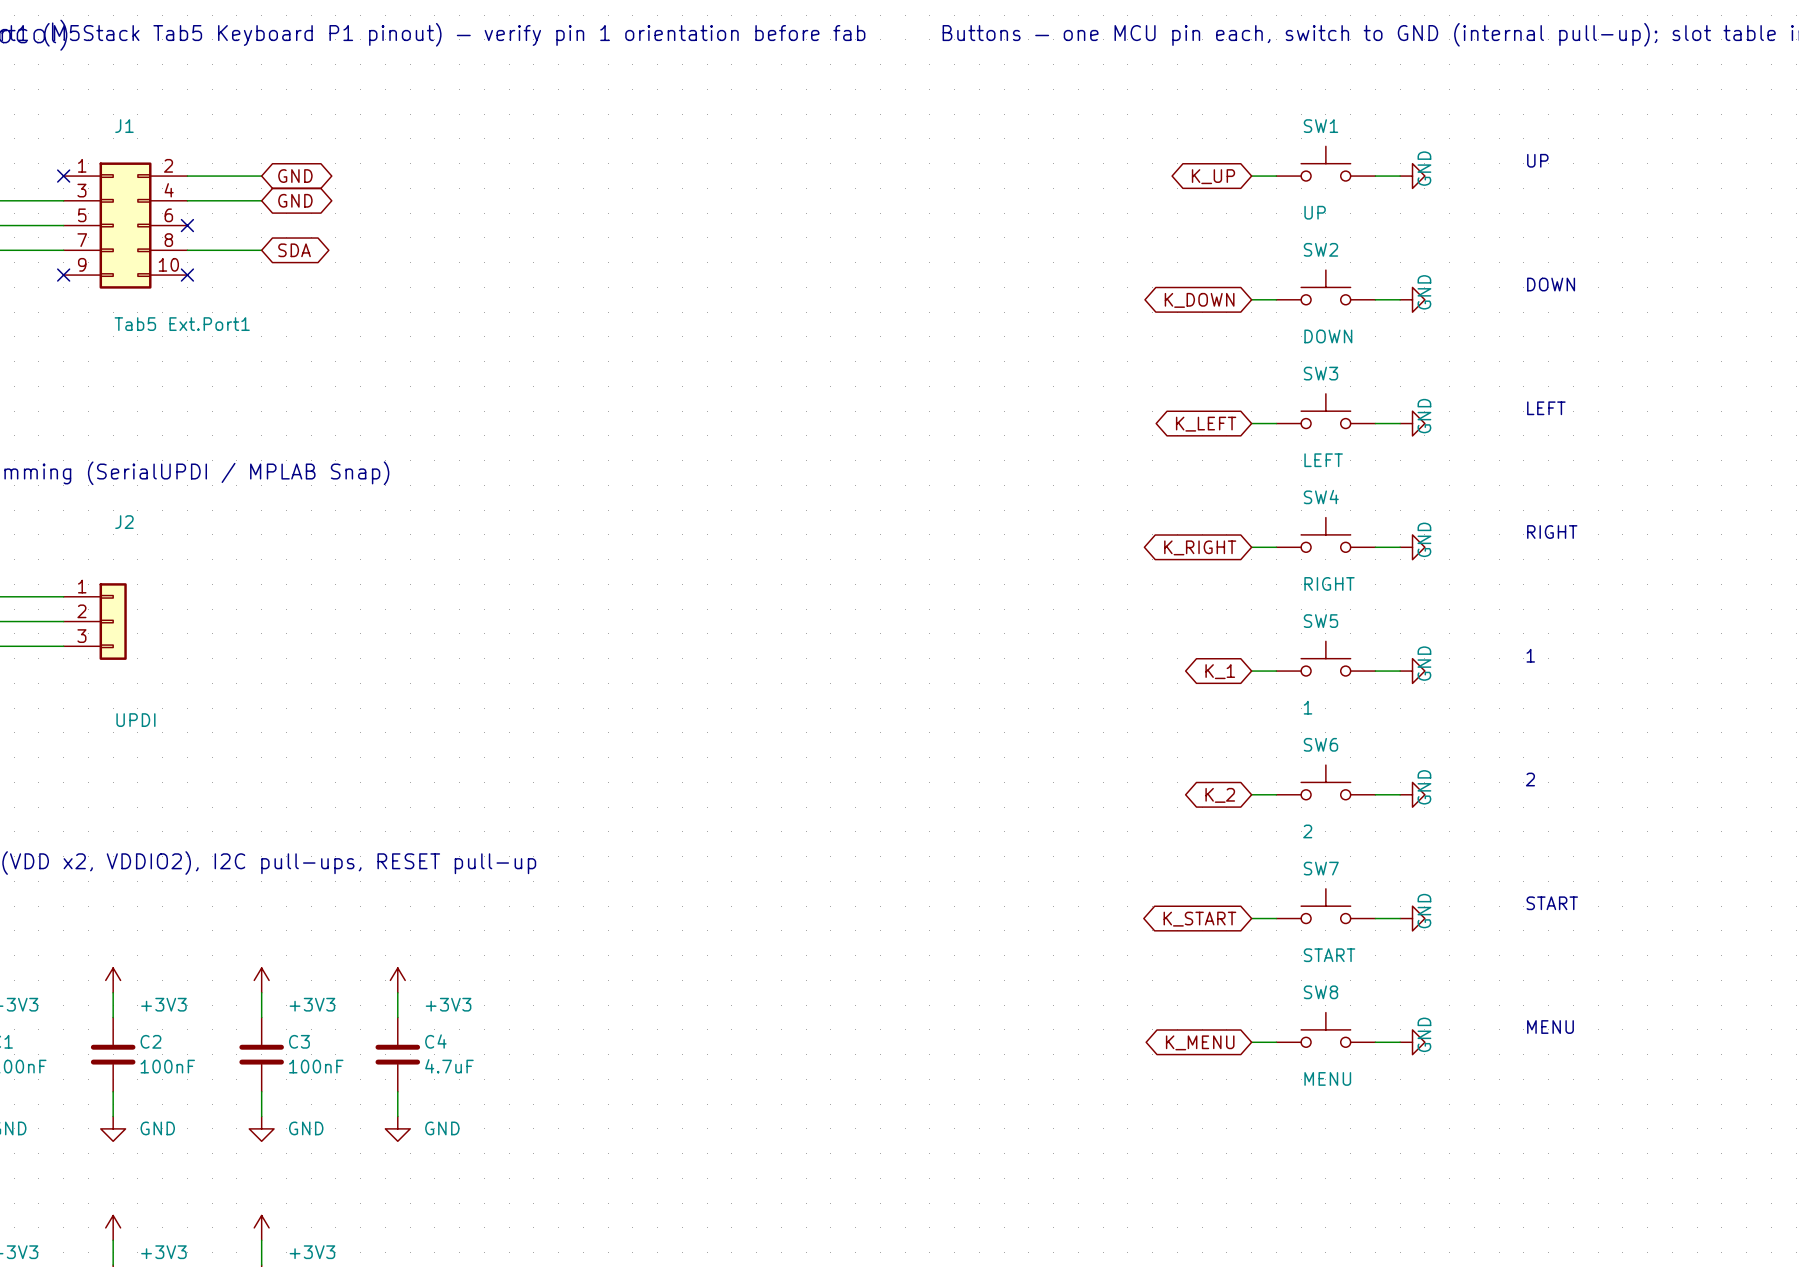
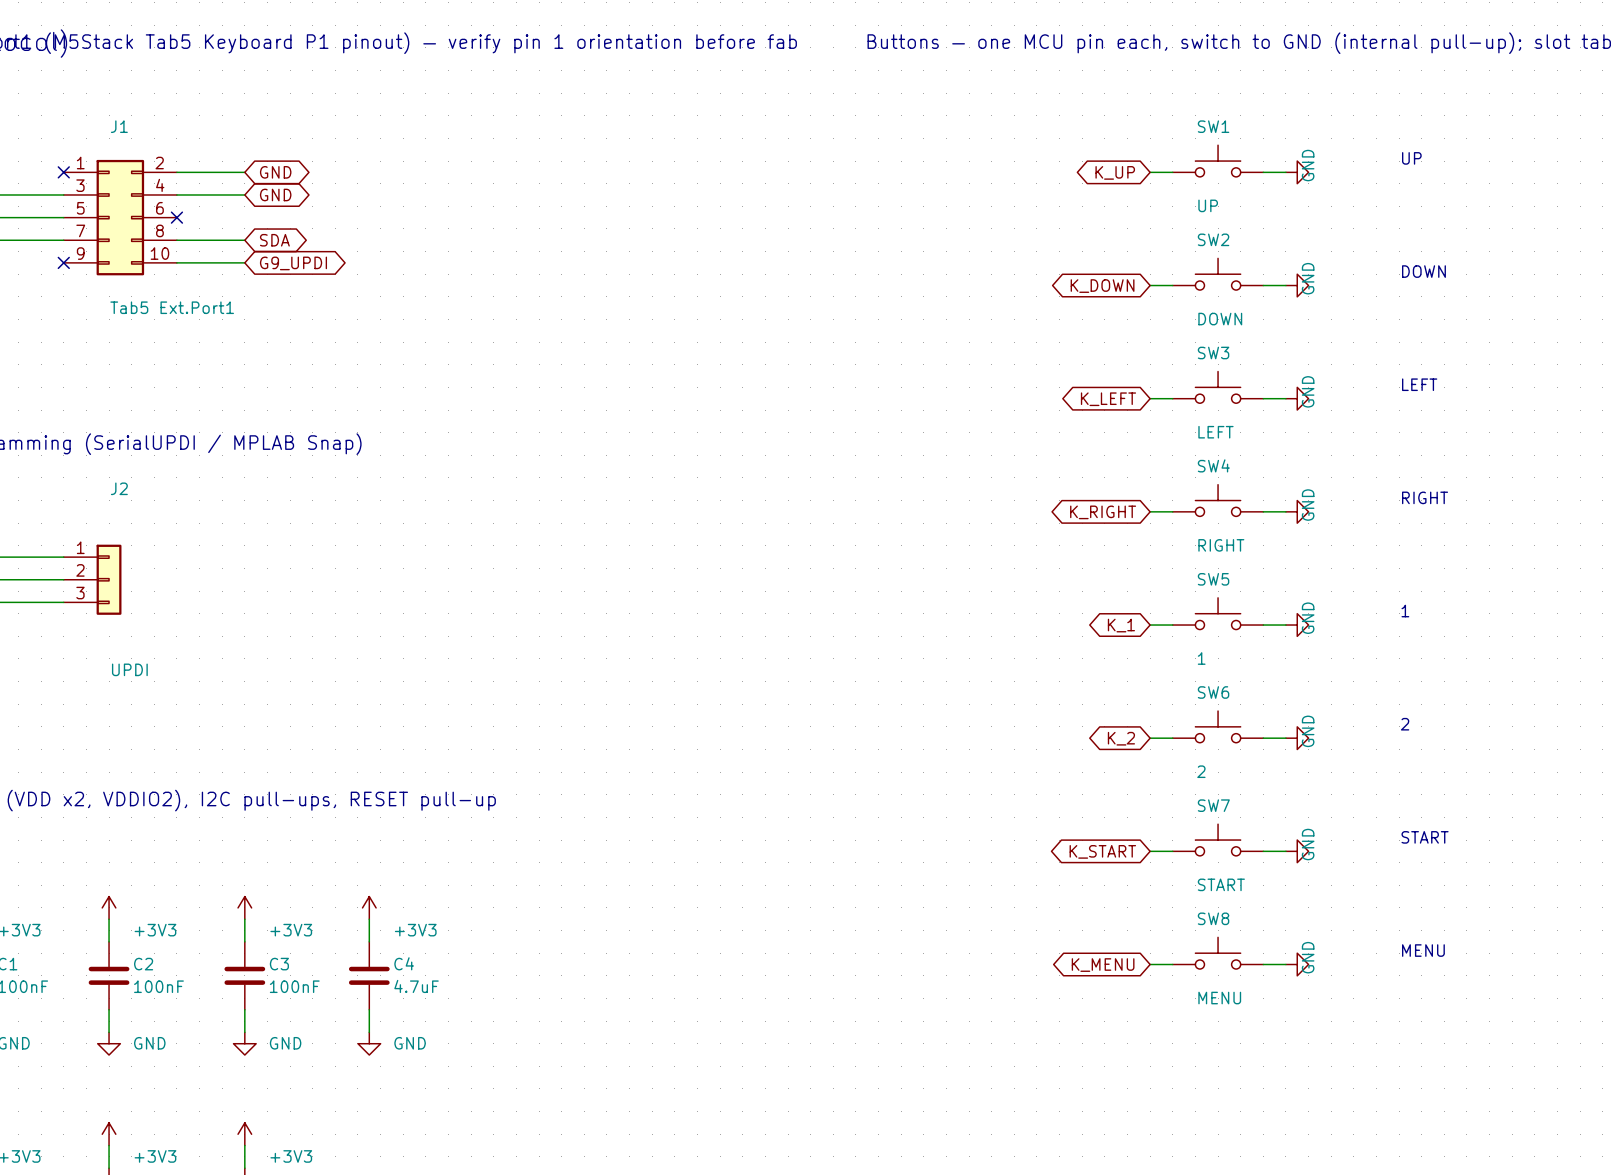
wire: none -> (176, 262) (244, 262)
no-connect mark: (187, 275) -> none
global label: none -> G9_UPDI (293, 263)

